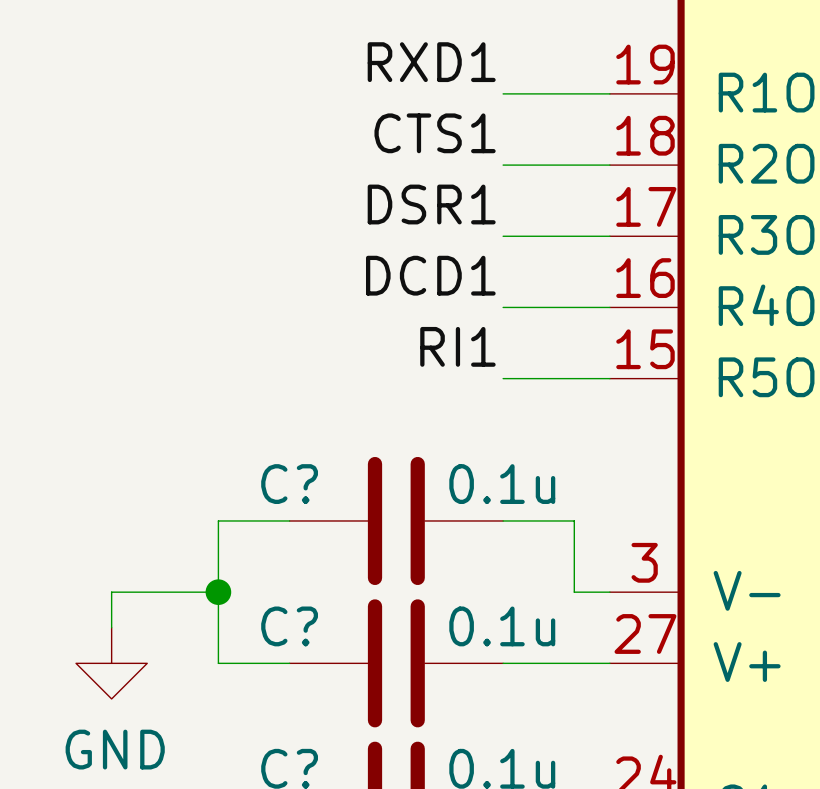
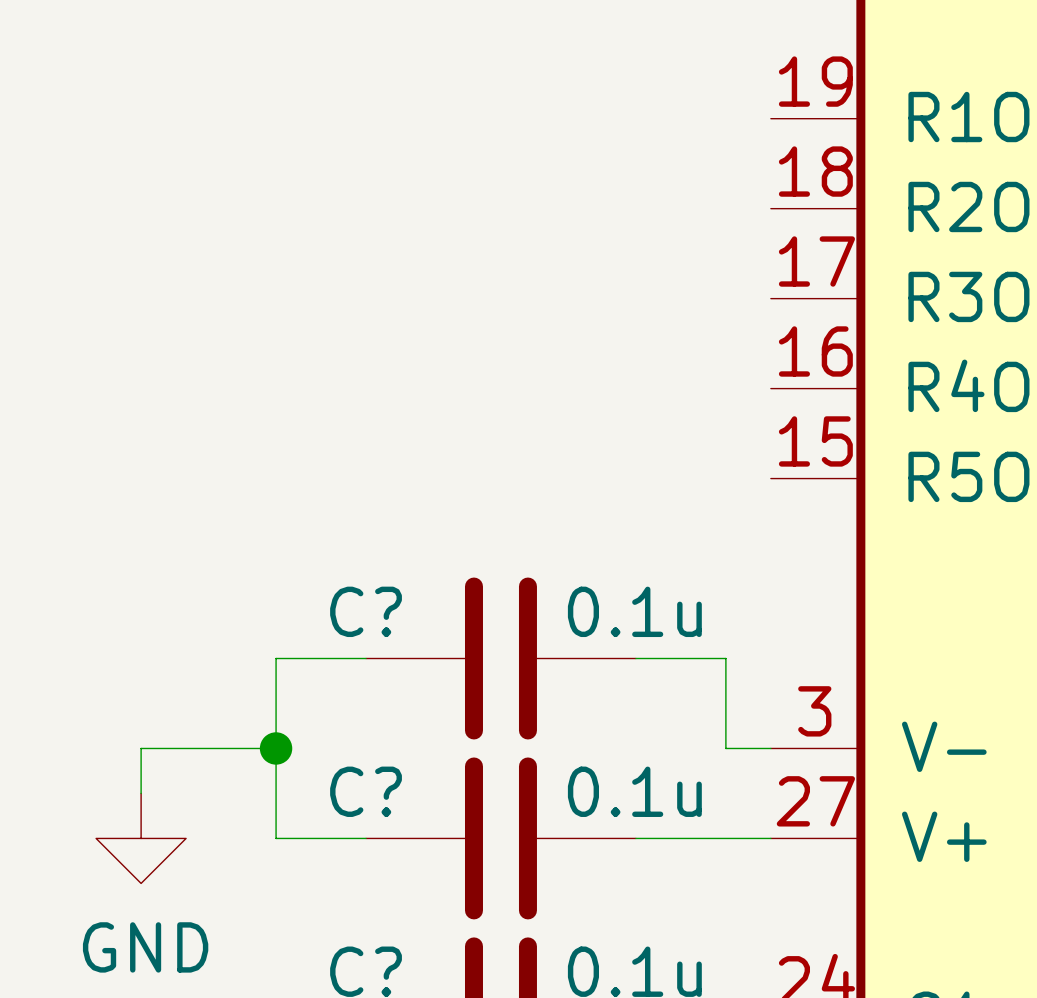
label: RXD1 (431, 62) -> none
wire: (503, 93) (609, 93) -> none
label: CTS1 (435, 133) -> none
wire: (503, 165) (609, 165) -> none
label: DSR1 (431, 204) -> none
wire: (503, 236) (609, 236) -> none
label: DCD1 (430, 275) -> none
wire: (503, 307) (609, 307) -> none
label: RI1 (457, 346) -> none
wire: (503, 378) (609, 378) -> none

